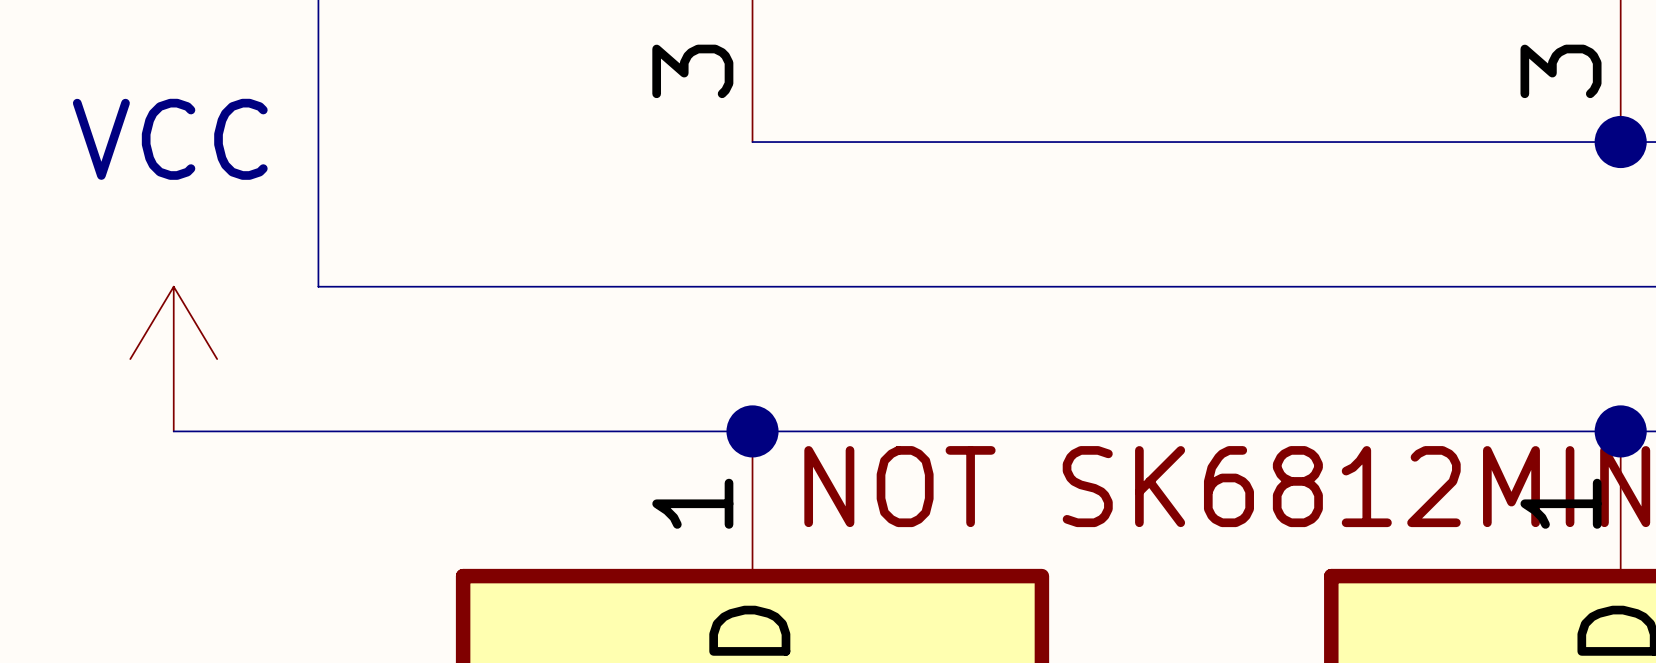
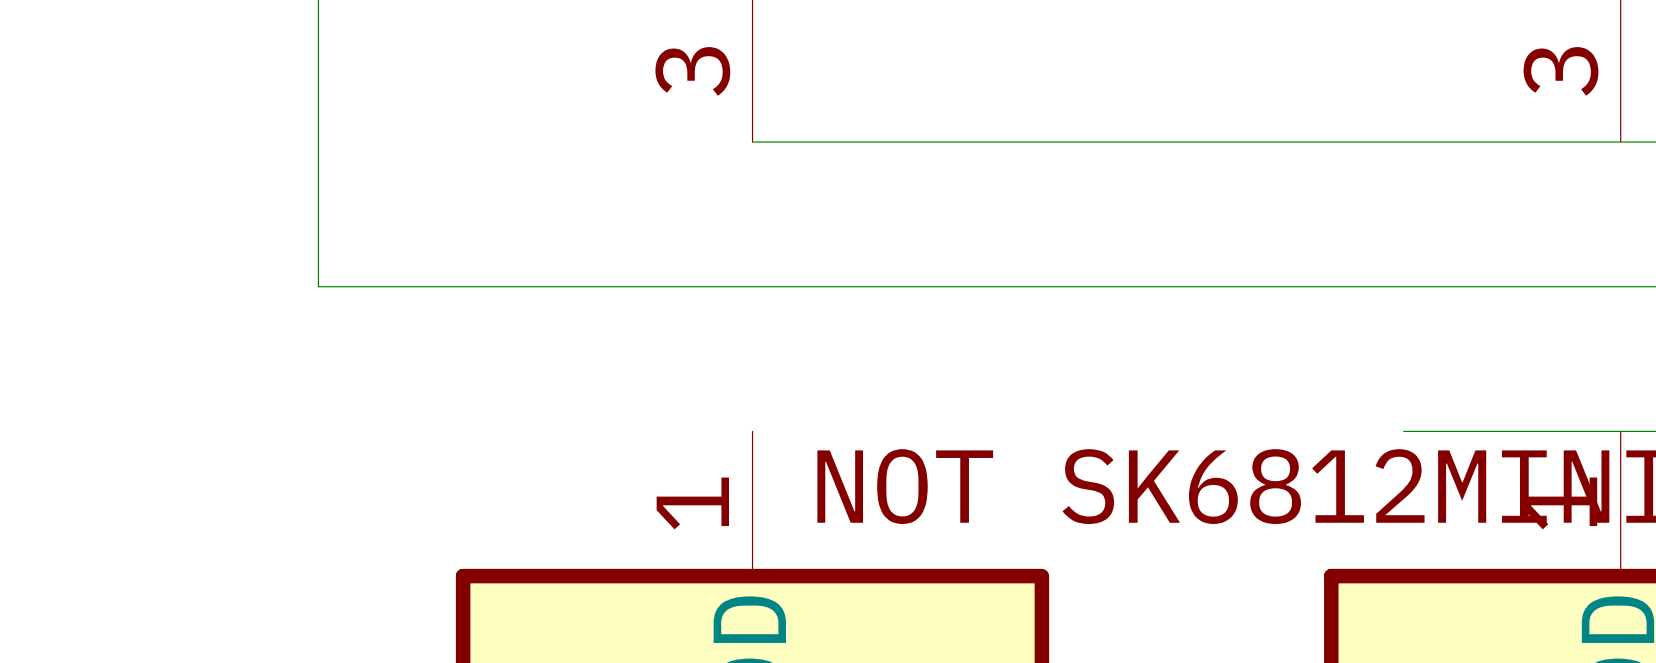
junction: (1620, 142) -> none
power symbol: VCC (173, 359) -> none
wire: (173, 431) (1403, 431) -> none
junction: (752, 431) -> none
junction: (1620, 431) -> none

